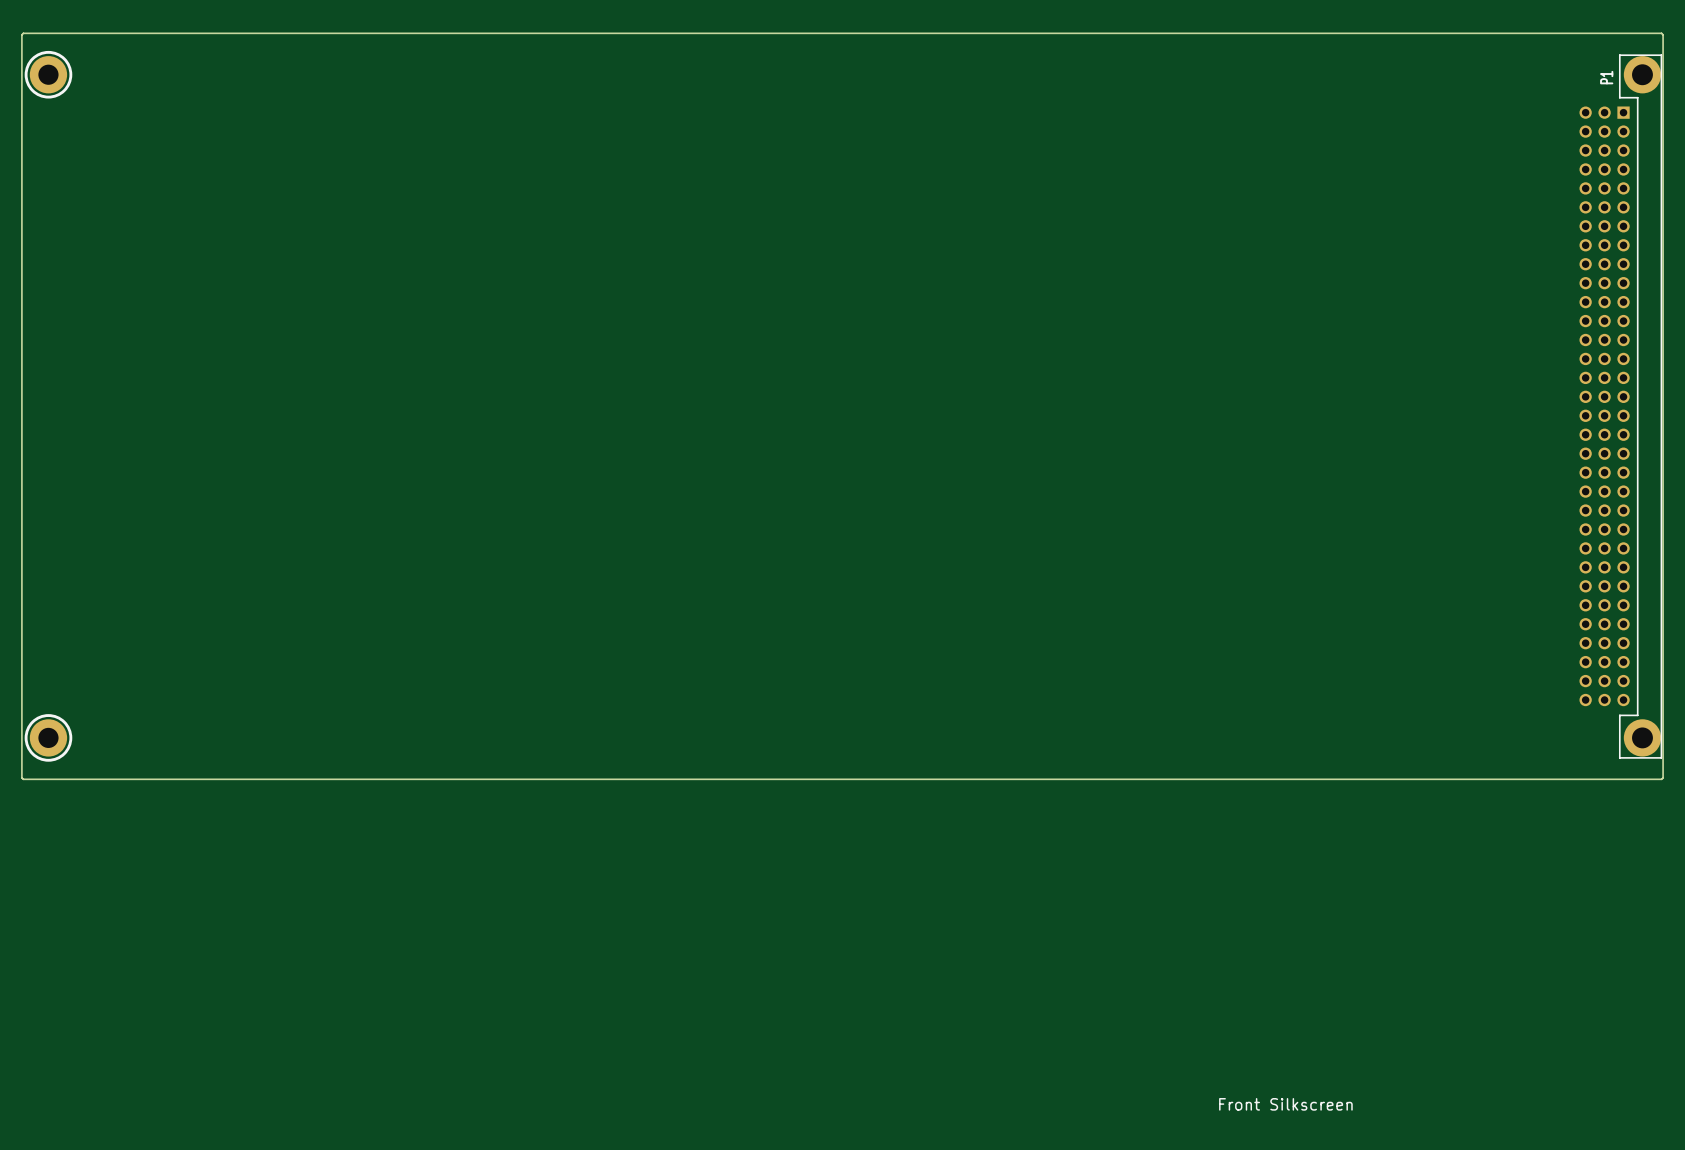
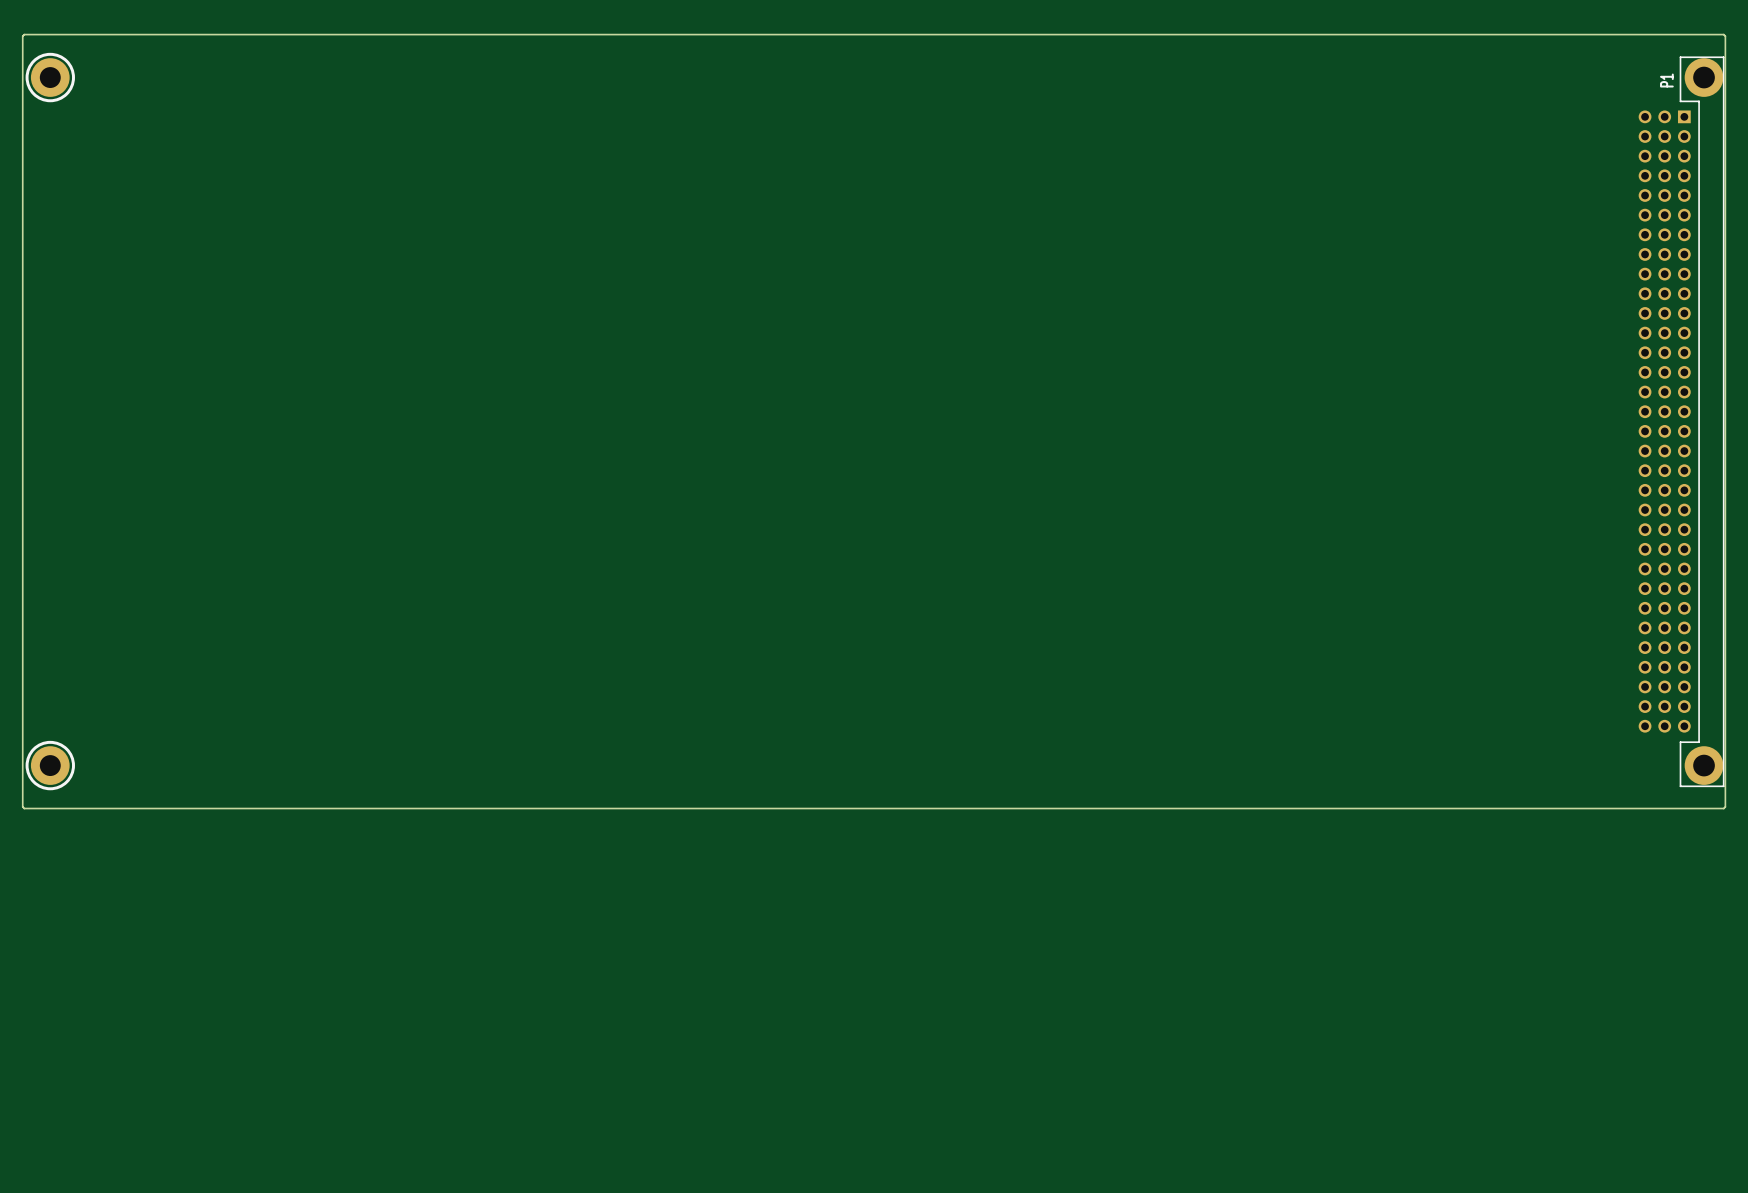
text: Front Silkscreen (1285, 1104) -> none

